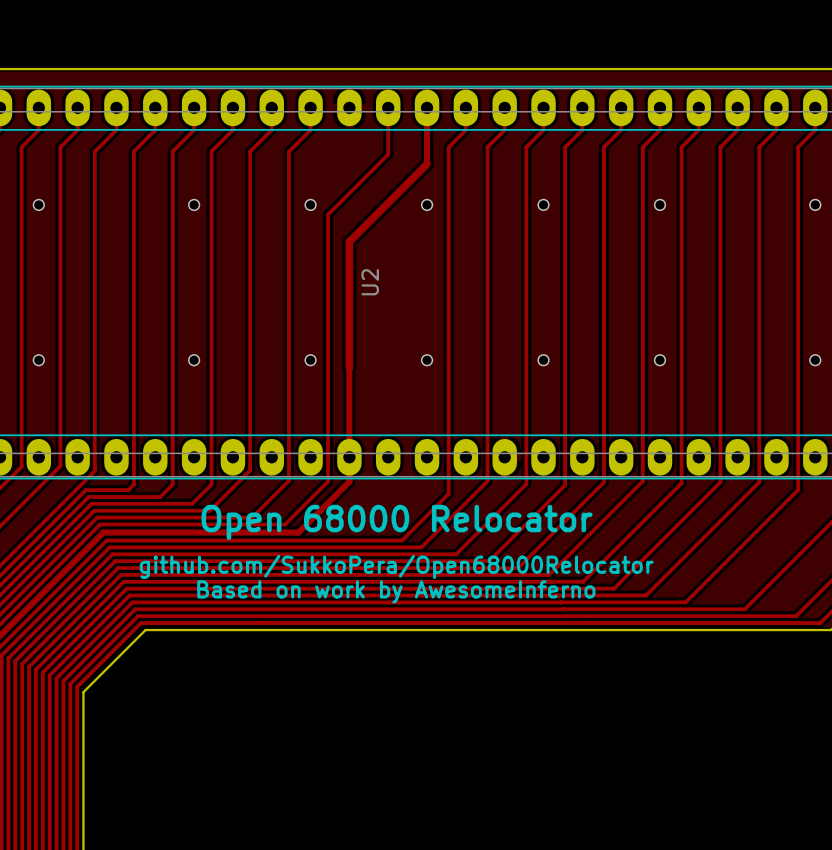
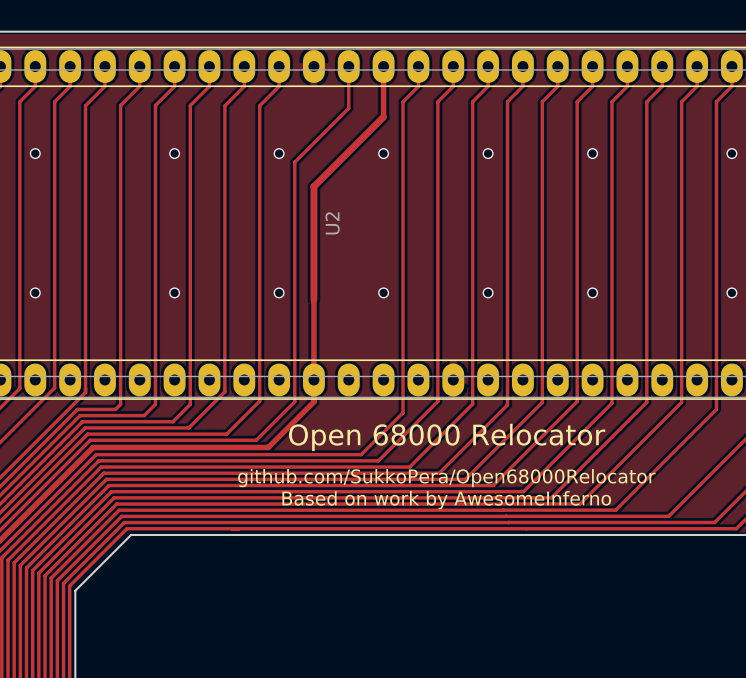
text position: Open 68000 Relocator (397, 522) -> Open 68000 Relocator (447, 437)
text position: github.com/SukkoPera/Open68000Relocator (396, 566) -> github.com/SukkoPera/Open68000Relocator (446, 478)
text position: Based on work by AwesomeInferno (396, 591) -> Based on work by AwesomeInferno (446, 500)

